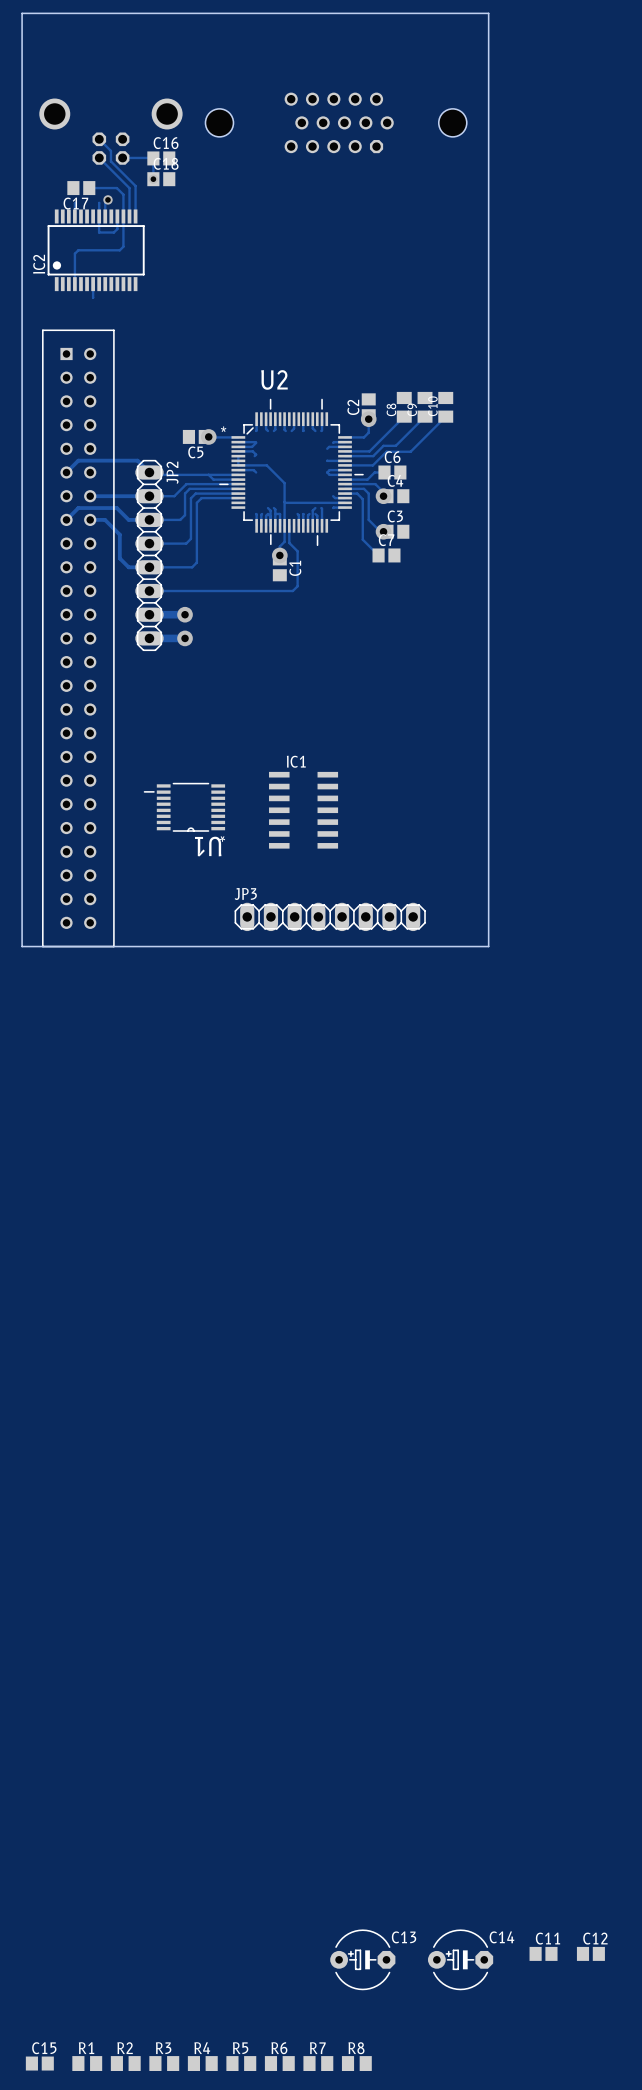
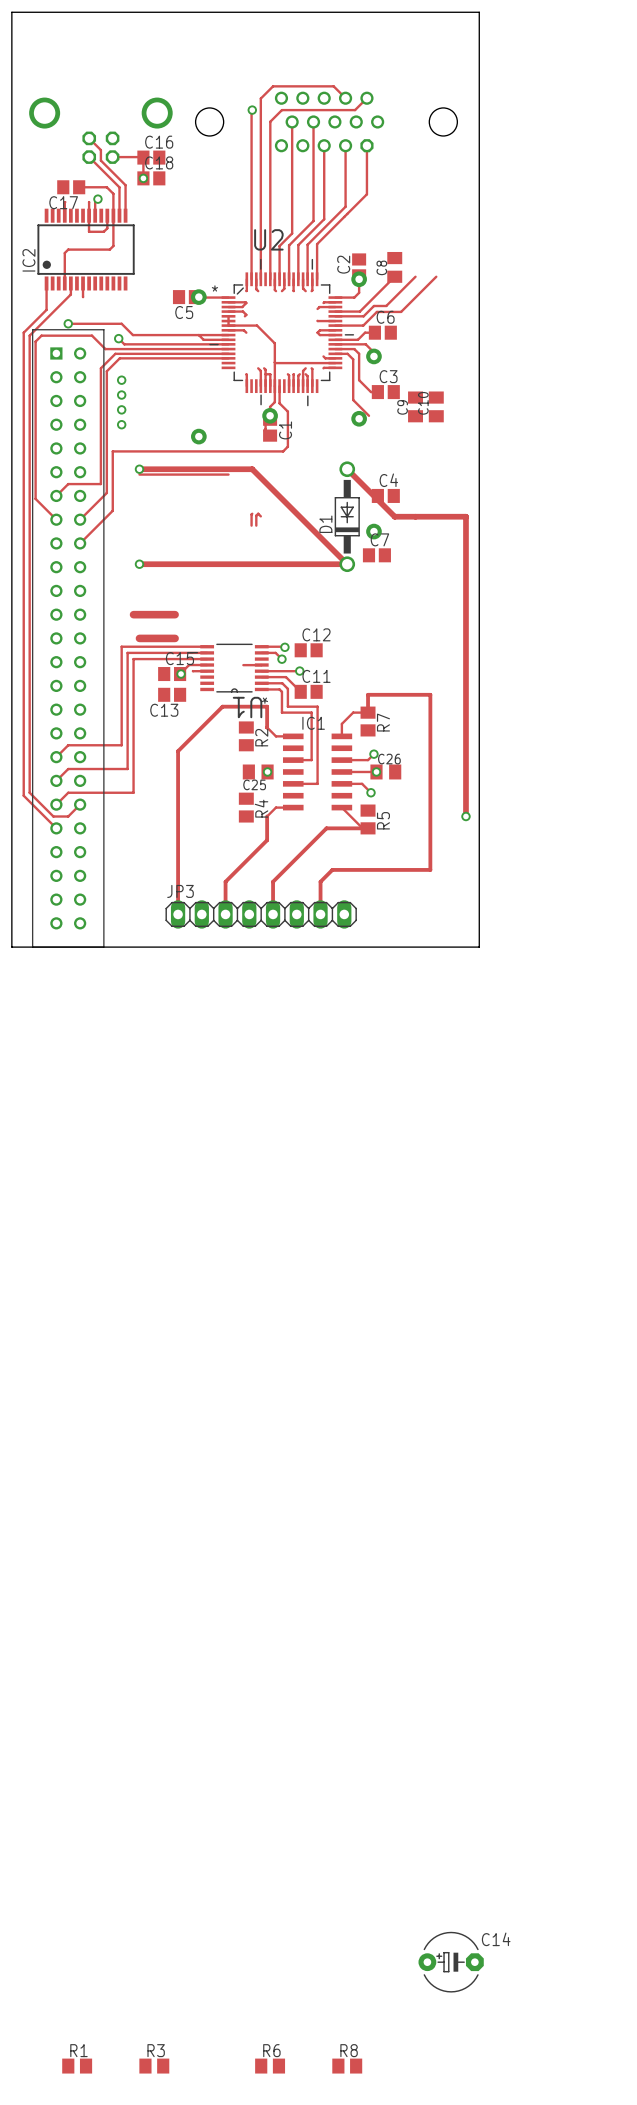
track: none -> (345, 98) (333, 86) (273, 86) (260, 98) (260, 279)
track: none -> (366, 98) (355, 110) (281, 110) (270, 121) (270, 279)
track: none -> (252, 110) (251, 279)
via: none -> (252, 110)
track: none -> (292, 121) (292, 233) (279, 246) (279, 279)
track: none -> (313, 121) (313, 221) (289, 245) (289, 279)
track: none -> (324, 145) (324, 219) (298, 245) (298, 279)
track: none -> (345, 145) (345, 206) (307, 244) (307, 279)
track: none -> (366, 145) (366, 194) (317, 244) (317, 279)
via: none -> (359, 279)
track: none -> (46, 283) (46, 309) (23, 332) (23, 795) (56, 828)
track: none -> (70, 283) (70, 294) (29, 335) (29, 792) (53, 816) (68, 816) (80, 804)
via: none -> (198, 297)
track: none -> (68, 323) (121, 323) (132, 335) (228, 335)
via: none -> (68, 323)
track: none -> (118, 338) (124, 344) (228, 344)
via: none -> (118, 338)
track: none -> (228, 353) (115, 353) (100, 368) (100, 484) (68, 484) (56, 495)
via: none -> (373, 356)
via: none -> (121, 380)
track: none -> (279, 386) (279, 403) (287, 411) (287, 446) (283, 451) (112, 451) (112, 510) (80, 543)
via: none -> (121, 395)
C2 position: (368, 407) -> (359, 267)
C8 position: (404, 407) -> (394, 267)
via: none -> (121, 409)
track: (368, 415) (368, 432) (363, 437) (345, 437) -> (359, 275) (359, 292) (354, 297) (335, 297)
via: none -> (270, 415)
track: (404, 416) (369, 451) (345, 451) -> (394, 276) (359, 311) (335, 311)
track: (425, 416) (395, 445) (383, 445) (373, 456) (345, 456) -> (415, 276) (386, 305) (373, 305) (363, 316) (335, 316)
track: (445, 416) (410, 451) (386, 451) (372, 465) (345, 465) -> (436, 276) (401, 311) (376, 311) (363, 325) (335, 325)
track: (256, 419) (256, 431) -> (246, 279) (246, 291)
track: (266, 419) (266, 429) (267, 431) -> (256, 279) (256, 289) (258, 291)
track: (284, 419) (285, 431) -> (274, 279) (276, 291)
track: (294, 419) (294, 428) (291, 431) -> (284, 279) (284, 288) (281, 291)
track: (303, 419) (303, 431) -> (293, 279) (293, 291)
track: (312, 419) (312, 428) (315, 431) -> (303, 279) (303, 288) (305, 291)
track: (322, 419) (321, 431) -> (312, 279) (311, 291)
via: none -> (121, 424)
C5 position: (196, 436) -> (186, 297)
track: (204, 437) (238, 437) -> (194, 297) (228, 297)
track: (238, 442) (256, 442) (252, 446) (238, 446) -> (228, 302) (246, 303) (242, 307) (228, 307)
track: (345, 442) (333, 442) -> (335, 302) (323, 303)
track: (345, 446) (329, 446) (327, 448) -> (335, 307) (319, 307) (317, 308)
track: (238, 451) (252, 451) (256, 454) (254, 456) -> (228, 311) (243, 311) (246, 314) (244, 316)
track: (238, 456) (238, 465) (266, 465) (284, 483) (284, 541) (279, 546) (279, 559) (284, 554) -> (228, 316) (228, 325) (257, 325) (274, 343) (274, 402) (270, 406) (270, 419) (274, 414)
track: (327, 460) (345, 460) -> (317, 320) (335, 321)
track: none -> (139, 469) (252, 469) (347, 564) (139, 564)
via: none -> (139, 469)
track: none -> (347, 469) (394, 516) (465, 516) (465, 816)
track: (238, 470) (253, 470) (256, 472) -> (228, 330) (243, 330) (246, 332)
track: (345, 470) (329, 470) (327, 472) (329, 474) (345, 474) -> (335, 330) (319, 330) (317, 332) (319, 335) (335, 335)
track: (66, 472) (78, 460) (137, 460) (149, 472) -> none
U2 position: (291, 472) -> (281, 332)
track: (384, 472) (374, 472) (367, 479) (345, 479) -> (374, 332) (365, 332) (357, 339) (335, 339)
C6 position: (392, 472) -> (382, 332)
track: (208, 474) (213, 479) (238, 479) -> (198, 335) (203, 339) (228, 339)
track: (238, 484) (186, 484) (174, 496) (90, 496) -> none
track: (345, 484) (375, 484) (387, 496) (383, 496) -> (335, 344) (365, 344) (377, 356) (373, 356)
track: (238, 488) (189, 488) (185, 493) (185, 515) (180, 519) (149, 519) -> none
track: (345, 488) (363, 488) (368, 493) (368, 519) (380, 531) (387, 531) -> (335, 349) (354, 349) (359, 353) (359, 380) (371, 392) (377, 392)
track: (238, 493) (195, 493) (190, 498) (190, 538) (186, 543) (149, 543) -> none
track: (345, 493) (357, 493) (362, 499) (362, 539) (378, 555) -> (335, 353) (347, 353) (353, 359) (353, 400) (368, 415)
track: (333, 496) (335, 498) (345, 498) -> (323, 356) (325, 358) (335, 358)
via: (383, 496) -> none
track: (238, 498) (201, 498) (196, 502) (196, 562) (192, 567) (128, 567) (119, 558) (119, 534) (105, 519) (90, 519) -> (228, 358) (119, 358) (106, 371) (106, 492) (80, 519)
track: (284, 502) (345, 502) -> (274, 362) (335, 363)
track: (345, 507) (333, 508) -> (335, 367) (323, 368)
track: (267, 508) (270, 510) (270, 525) -> (258, 368) (260, 370) (260, 386)
track: (273, 508) (275, 525) -> (264, 368) (265, 386)
track: (315, 508) (312, 510) (312, 525) -> (305, 368) (303, 370) (303, 386)
track: (321, 508) (322, 525) -> (311, 368) (312, 386)
track: (256, 513) (256, 525) -> (246, 374) (246, 386)
track: (275, 513) (280, 514) (280, 525) -> (265, 374) (270, 374) (270, 386)
track: (297, 513) (298, 525) -> (287, 374) (289, 386)
track: (303, 513) (303, 525) -> (293, 374) (293, 386)
track: (309, 513) (308, 525) -> (299, 374) (298, 386)
track: (315, 513) (317, 515) (317, 525) -> (305, 374) (307, 376) (307, 386)
D1: none -> (347, 516)
track: (66, 519) (78, 508) (116, 508) (128, 519) (155, 519) -> (56, 519) (35, 498) (35, 341) (41, 335) (92, 335) (105, 349) (228, 349)
track: (289, 525) (289, 543) (297, 551) (297, 586) (292, 591) (149, 591) -> none
C3 position: (395, 531) -> (385, 392)
JP2: (149, 555) -> none
via: (279, 555) -> none
via: none -> (139, 564)
C1 position: (279, 567) -> (270, 427)
via: (185, 614) -> none
via: (185, 638) -> none
track: none -> (207, 646) (121, 646) (121, 745) (68, 745) (56, 757)
track: none -> (261, 646) (284, 647)
via: none -> (284, 647)
track: none -> (207, 652) (127, 652) (127, 769) (68, 769) (56, 780)
track: none -> (261, 652) (275, 652) (281, 659)
track: none -> (207, 659) (133, 659) (133, 792) (68, 792) (56, 804)
via: none -> (281, 659)
track: none -> (207, 665) (189, 665) (181, 674)
track: none -> (243, 665) (261, 665)
track: none -> (193, 671) (207, 671)
track: none -> (261, 671) (300, 671)
via: none -> (299, 671)
via: none -> (181, 674)
track: none -> (261, 677) (286, 677) (300, 691)
track: none -> (261, 683) (282, 683) (287, 688) (287, 706) (317, 706) (317, 783) (293, 783)
track: none -> (261, 689) (279, 689) (281, 691) (281, 712) (311, 712) (311, 760) (293, 760)
track: none -> (293, 736) (276, 736) (267, 727) (267, 706) (222, 706) (178, 751) (178, 914)
track: none -> (341, 736) (341, 723) (353, 712) (368, 712) (368, 694) (430, 694) (430, 869) (332, 869) (320, 881) (320, 914)
track: none -> (373, 754) (368, 760) (341, 760)
via: none -> (373, 754)
C25: none -> (258, 771)
via: none -> (267, 771)
track: none -> (341, 771) (376, 771)
via: none -> (376, 771)
C26: none -> (385, 771)
track: none -> (341, 783) (362, 783) (371, 792)
via: none -> (371, 792)
U1 position: (184, 807) -> (227, 668)
track: none -> (293, 807) (276, 807) (267, 816) (267, 840) (225, 881) (225, 914)
track: none -> (341, 807) (362, 828)
IC1 position: (303, 810) -> (317, 771)
via: none -> (465, 816)
track: none -> (362, 828) (326, 828) (273, 881) (273, 914)
JP3 position: (330, 916) -> (261, 914)
C13 footprint: [330, 1929, 396, 1991] -> [158, 687, 187, 702]
C13 name position: C13 (404, 1937) -> C13 (164, 710)
C11 position: (543, 1953) -> (308, 691)
C12 position: (590, 1953) -> (308, 650)
C15 position: (39, 2063) -> (172, 674)
R2 rotation: 0° (125, 2063) -> 90° clockwise (246, 736)
R2 position: (125, 2063) -> (246, 736)
R4 rotation: 0° (202, 2063) -> 90° clockwise (246, 807)
R4 position: (202, 2063) -> (246, 807)
R5 rotation: 0° (241, 2063) -> 90° clockwise (368, 819)
R5 position: (241, 2063) -> (368, 819)
R7 rotation: 0° (318, 2063) -> 90° clockwise (368, 721)
R7 position: (318, 2063) -> (368, 721)

